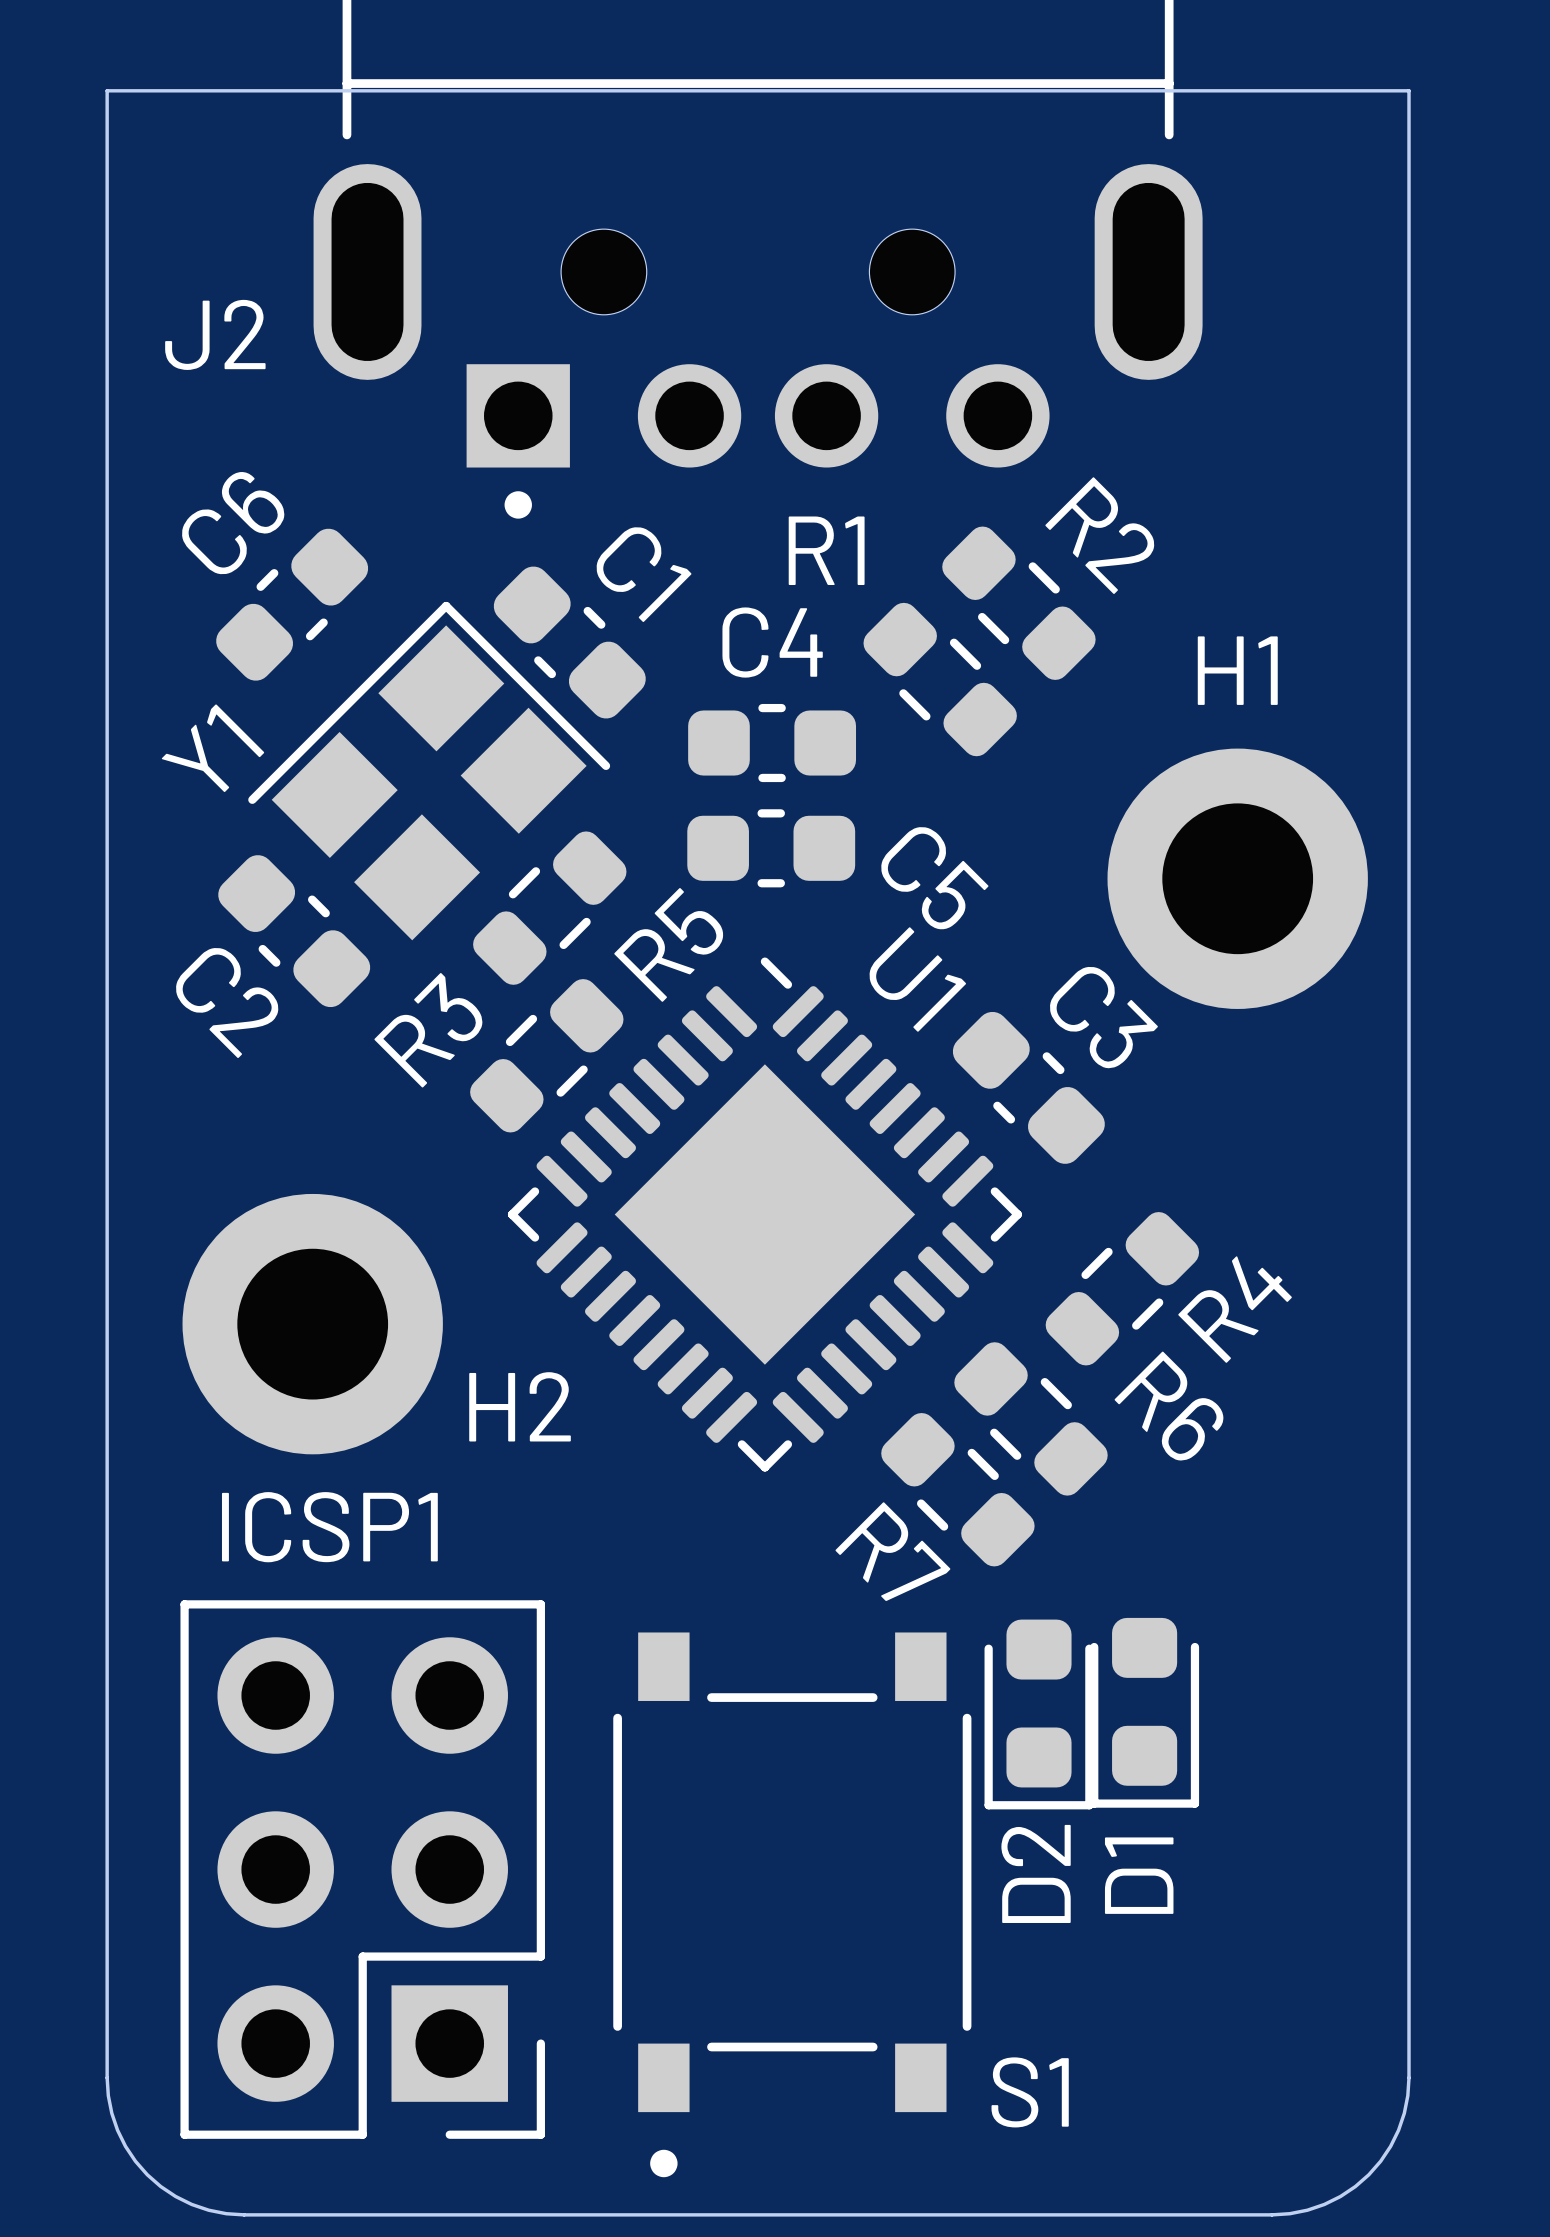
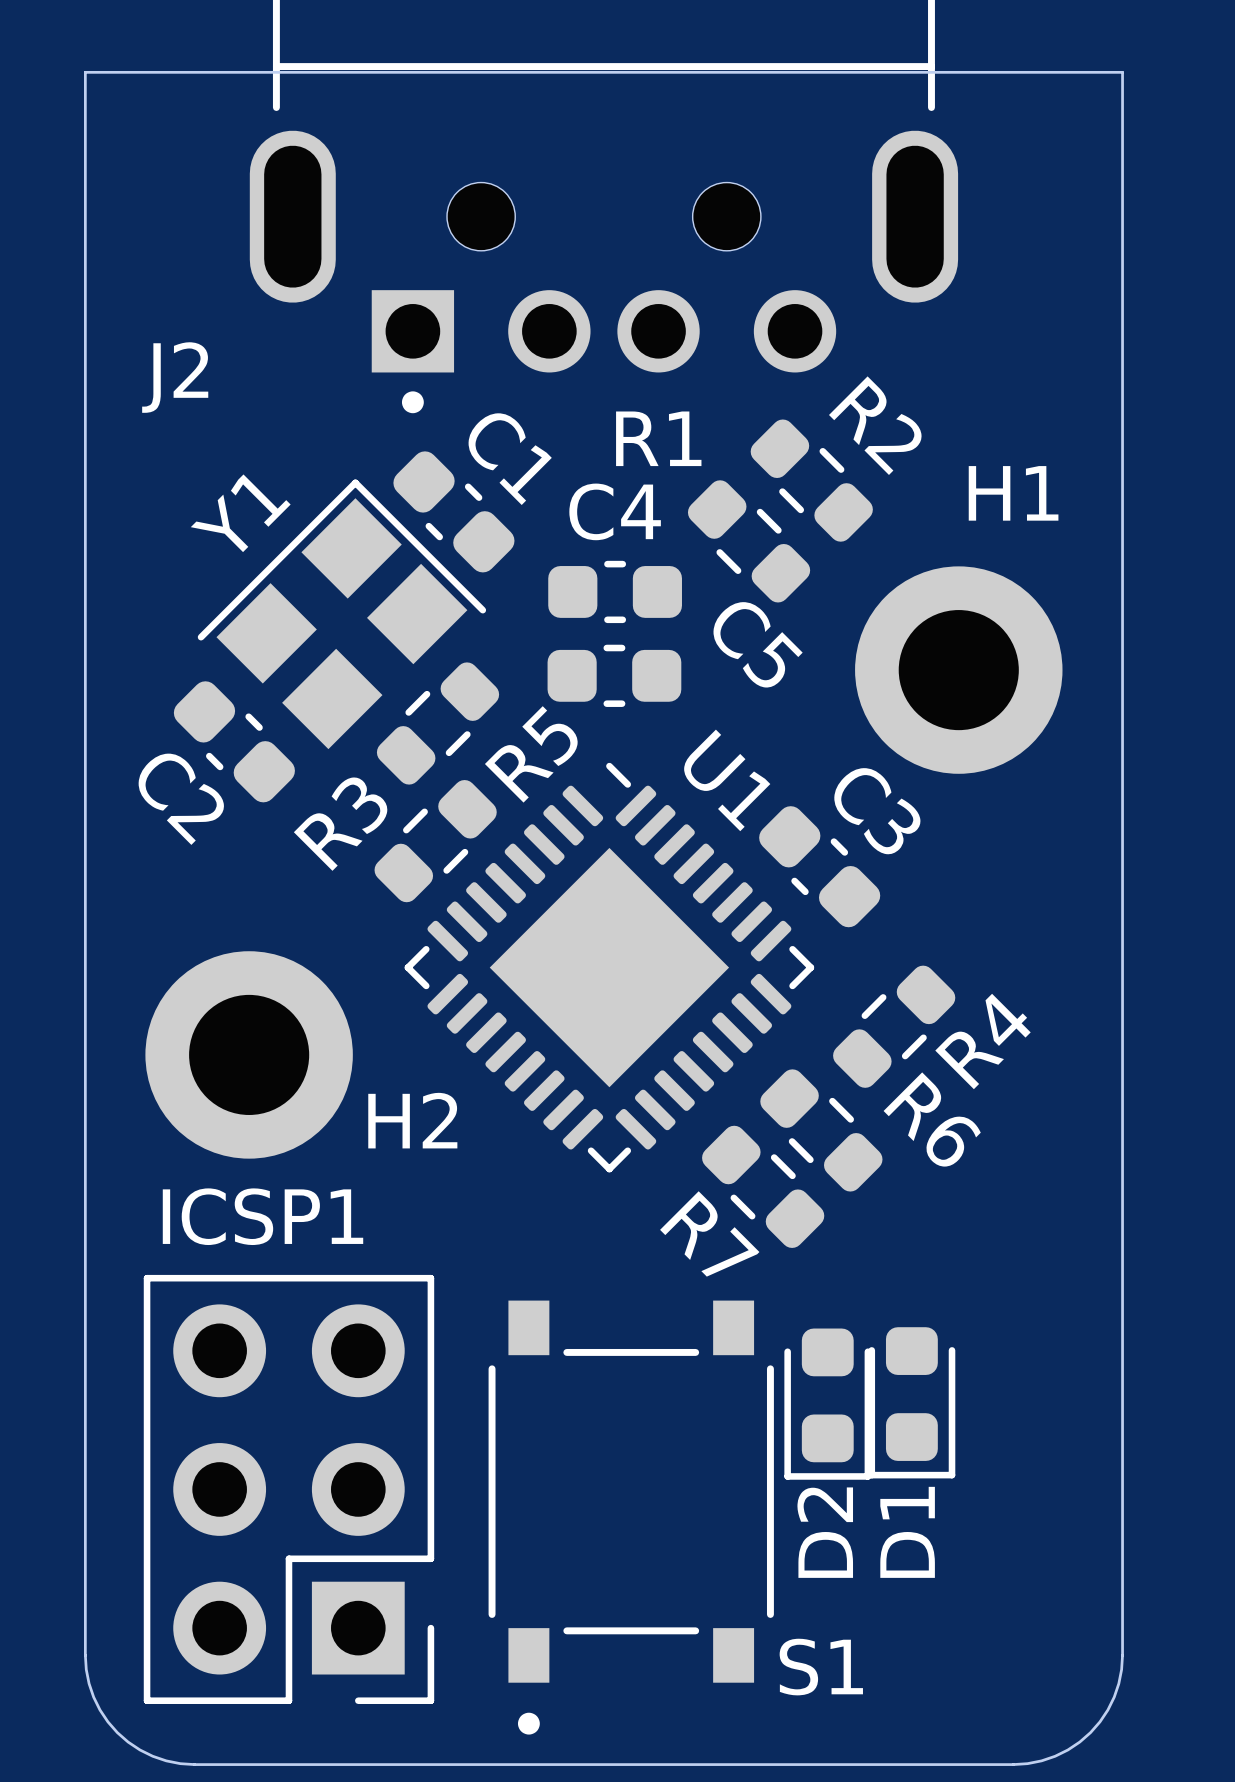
J2 name position: J2 (215, 334) -> J2 (175, 377)
C6: (292, 604) -> none
H1 name position: H1 (1237, 670) -> H1 (1013, 493)
Y1 name position: Y1 (213, 748) -> Y1 (240, 513)
C5 name position: C5 (934, 878) -> C5 (757, 644)
H1 position: (1237, 878) -> (958, 670)
D1 position: (1144, 1712) -> (911, 1402)
D2 position: (1039, 1714) -> (827, 1404)

